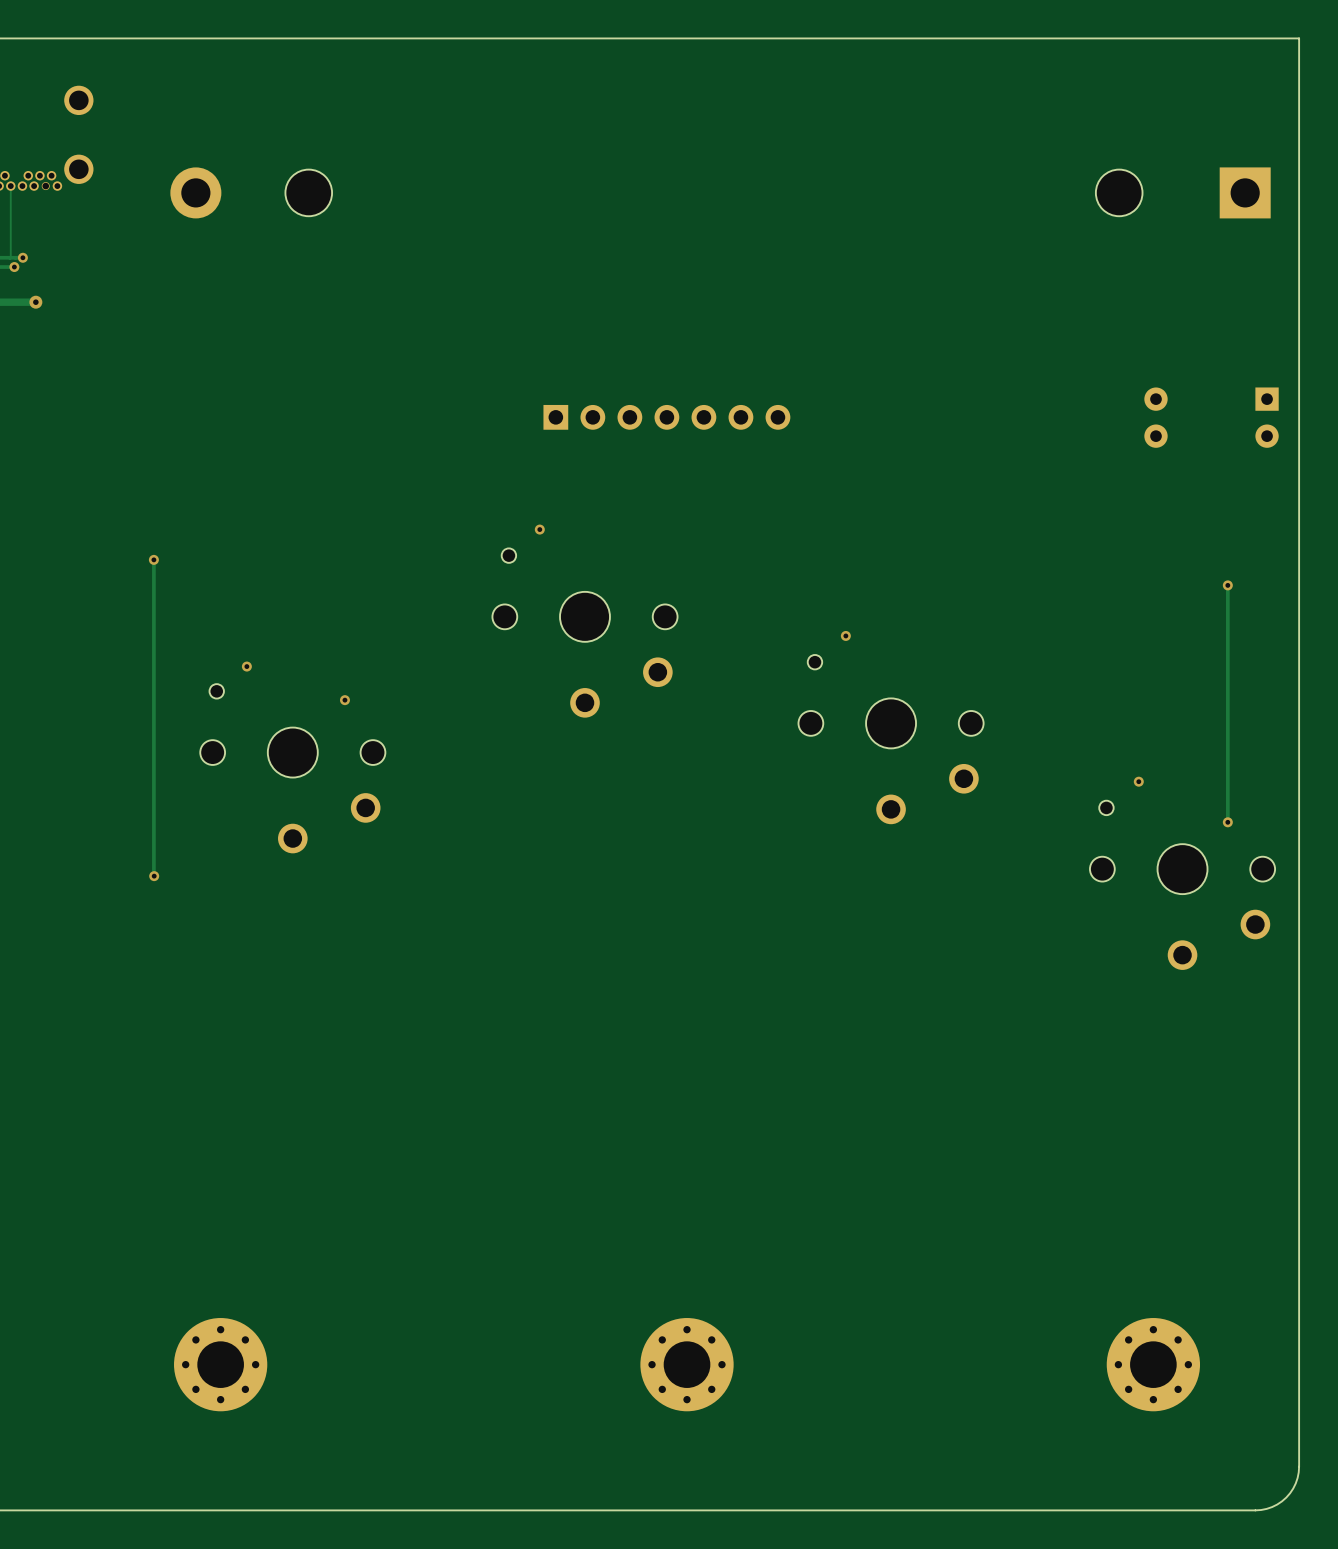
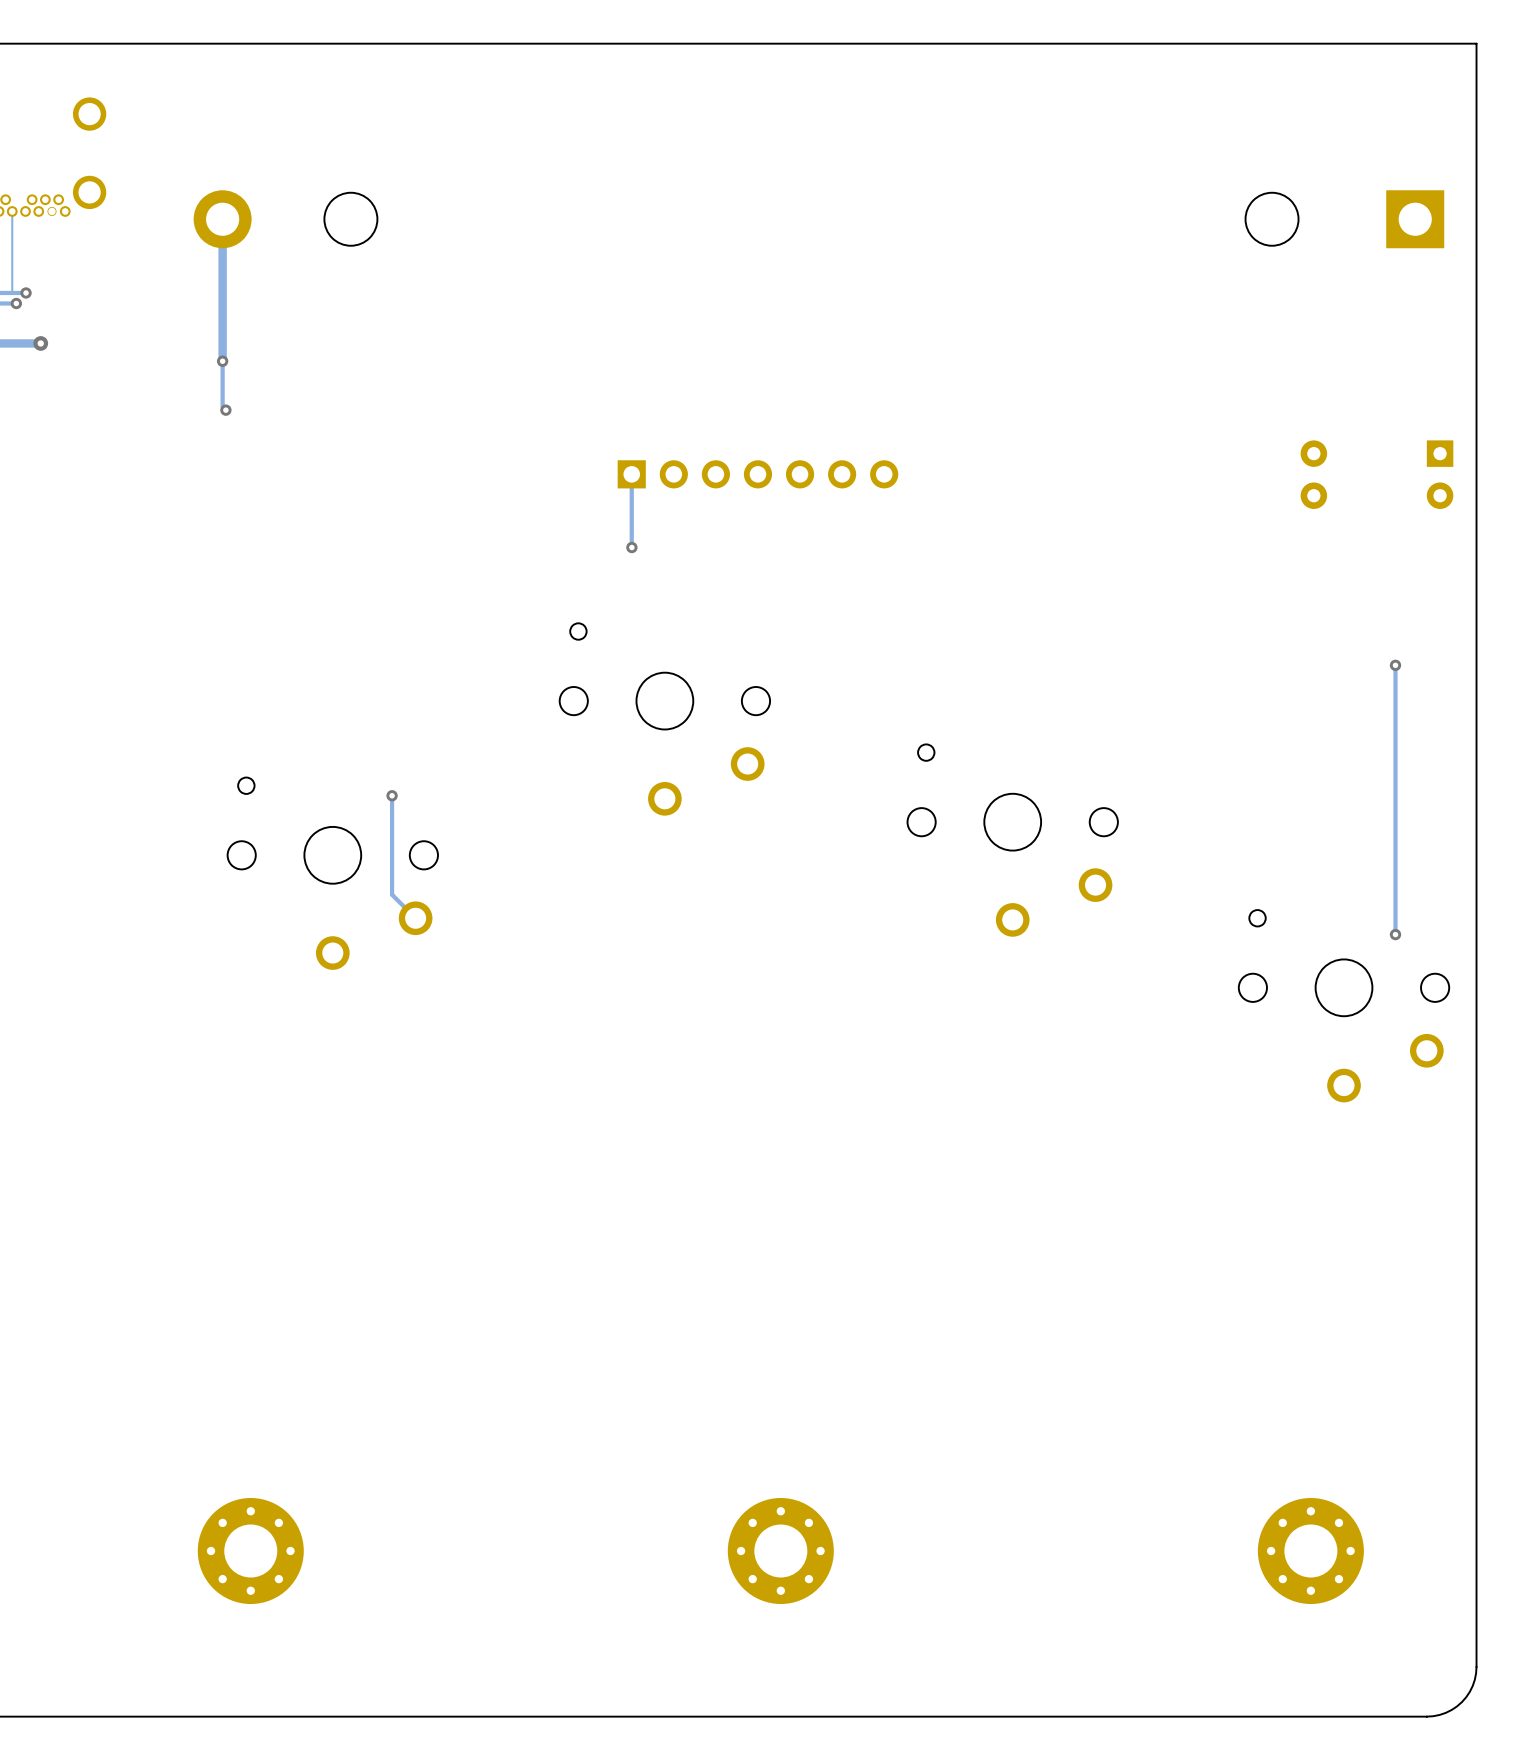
track: none -> (222, 219) (222, 406)
via: none -> (222, 361)
via: none -> (225, 410)
track: none -> (631, 474) (631, 547)
via position: (539, 529) -> (631, 547)
track: (153, 559) (154, 876) -> none
via: (153, 559) -> none
via: (845, 635) -> none
via: (246, 666) -> none
track: none -> (392, 795) (392, 894) (415, 918)
via: (1138, 781) -> none
via: (154, 876) -> none

